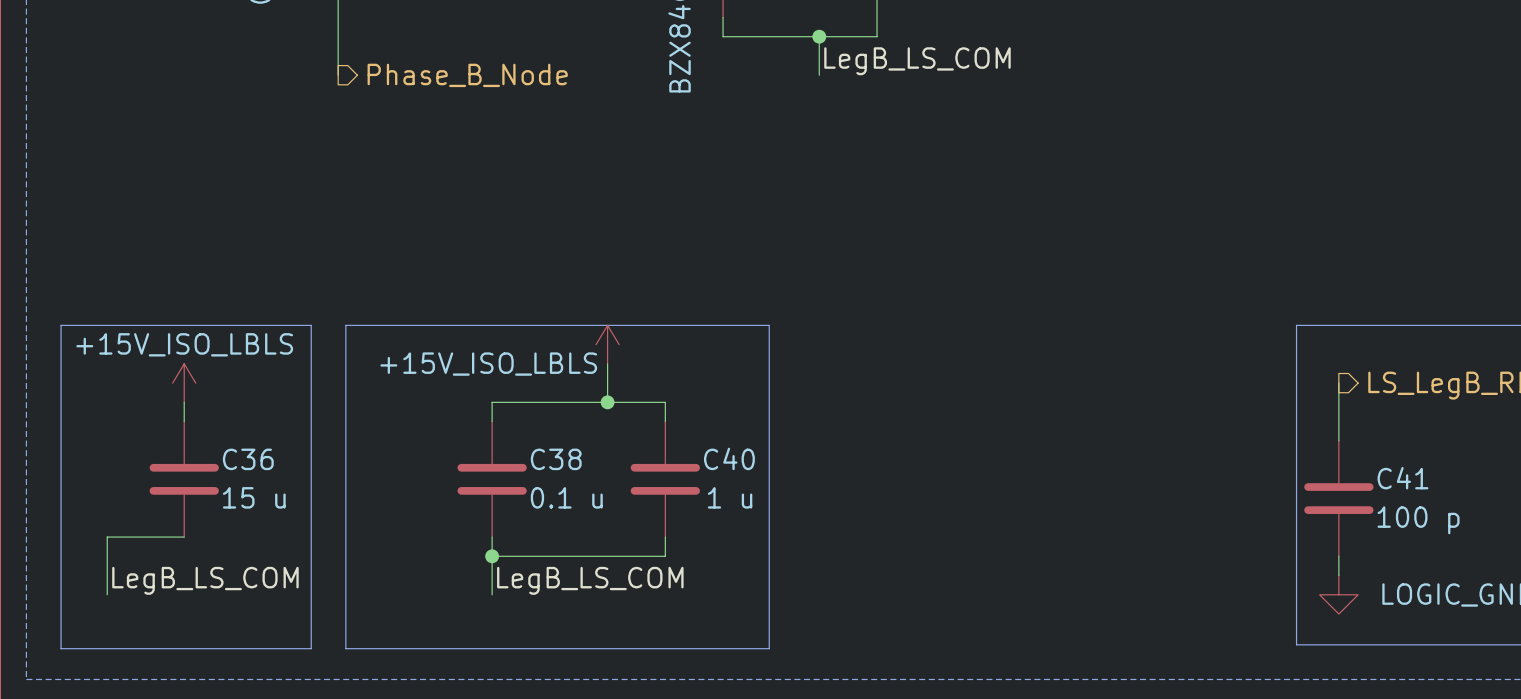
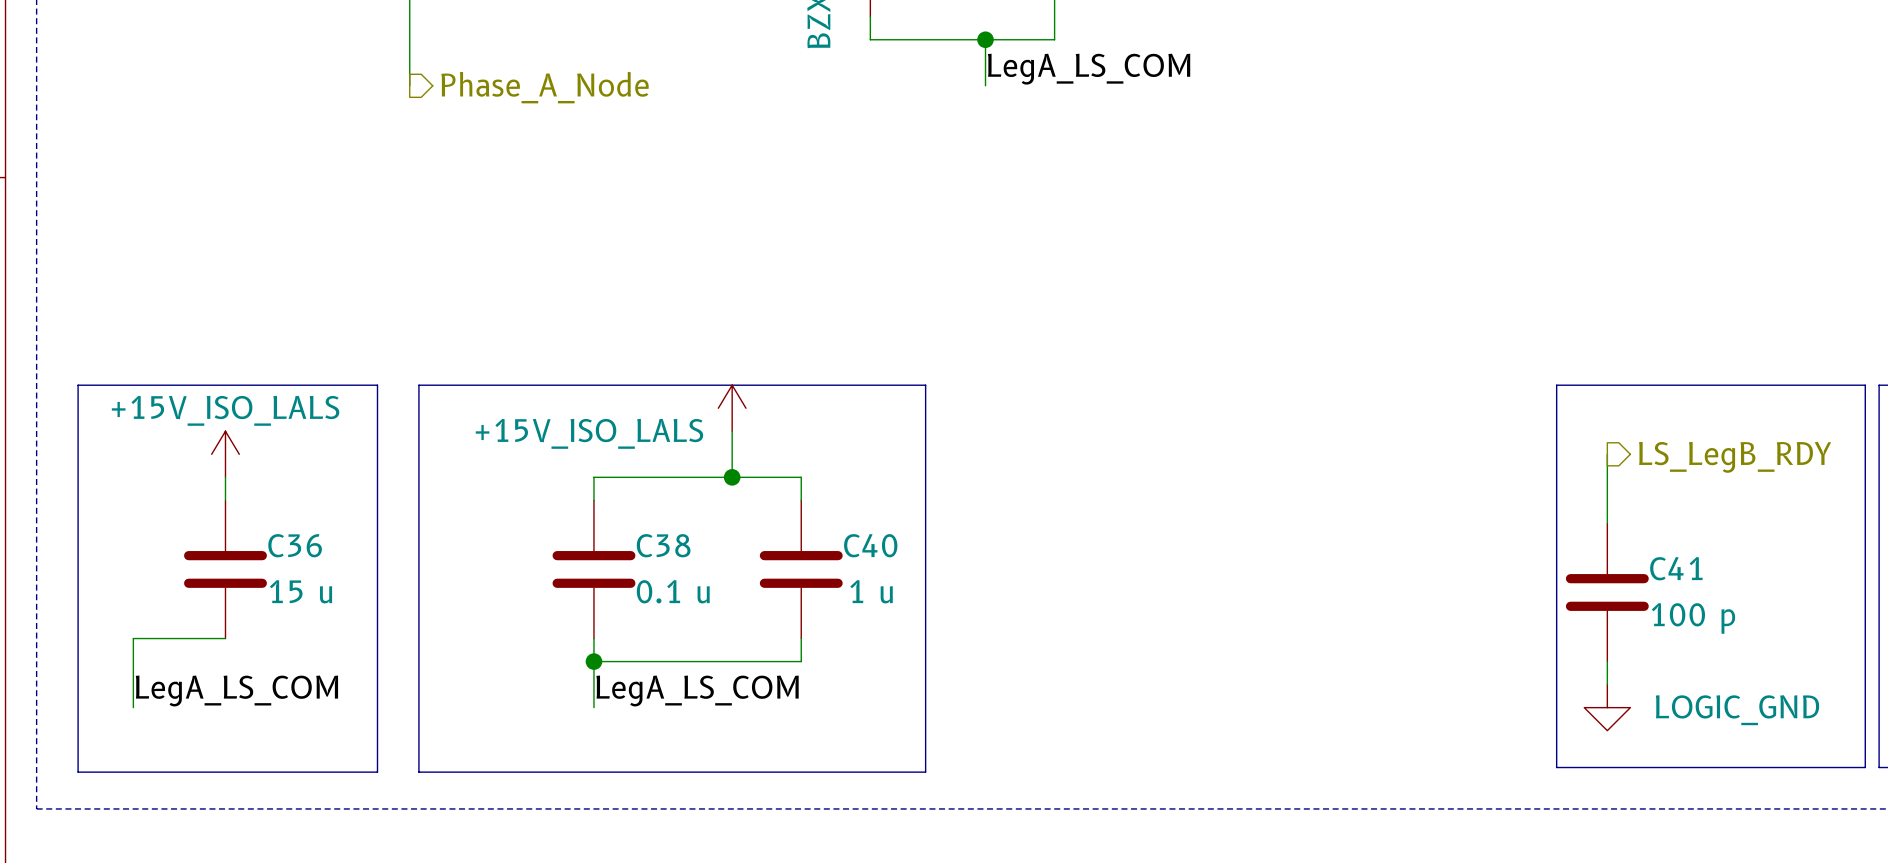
label: LegB_LS_COM (917, 61) -> LegA_LS_COM (1089, 69)
hierarchical label: Phase_B_Node (467, 75) -> Phase_A_Node (545, 87)
power symbol: +15V_ISO_LBLS (607, 344) -> +15V_ISO_LALS (732, 408)
power symbol: +15V_ISO_LBLS (184, 383) -> +15V_ISO_LALS (225, 454)
label: LegB_LS_COM (205, 580) -> LegA_LS_COM (236, 691)
label: LegB_LS_COM (590, 580) -> LegA_LS_COM (697, 691)

